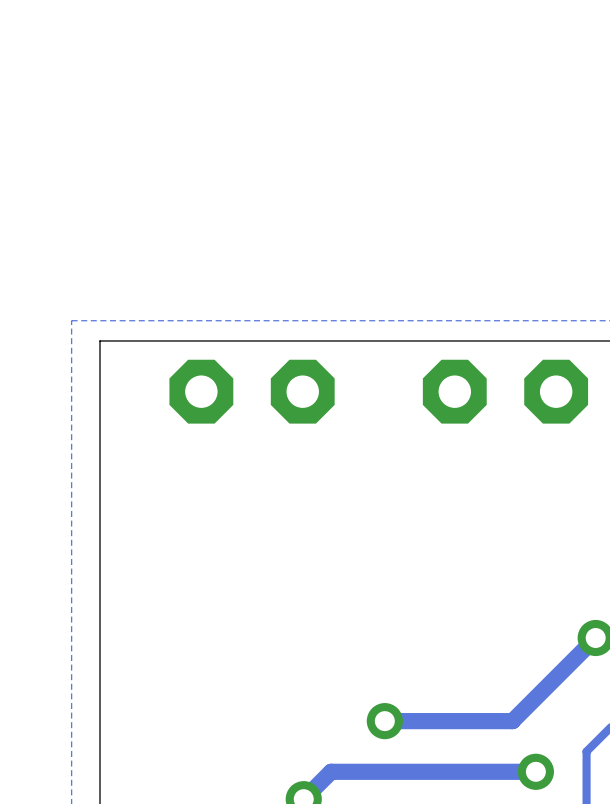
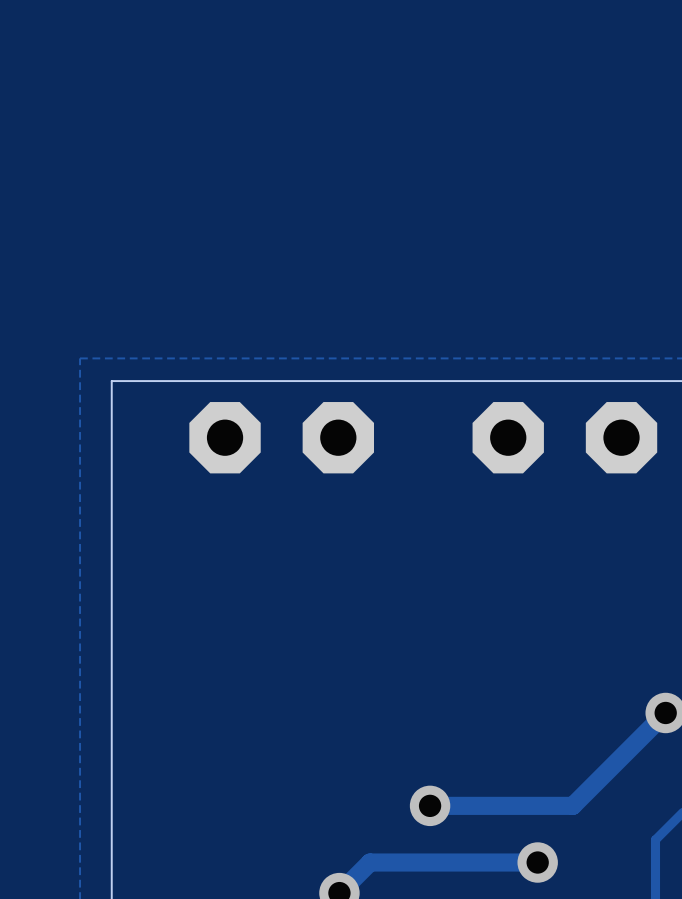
track: (535, 771) (481, 771) -> none
via position: (535, 771) -> (537, 862)

